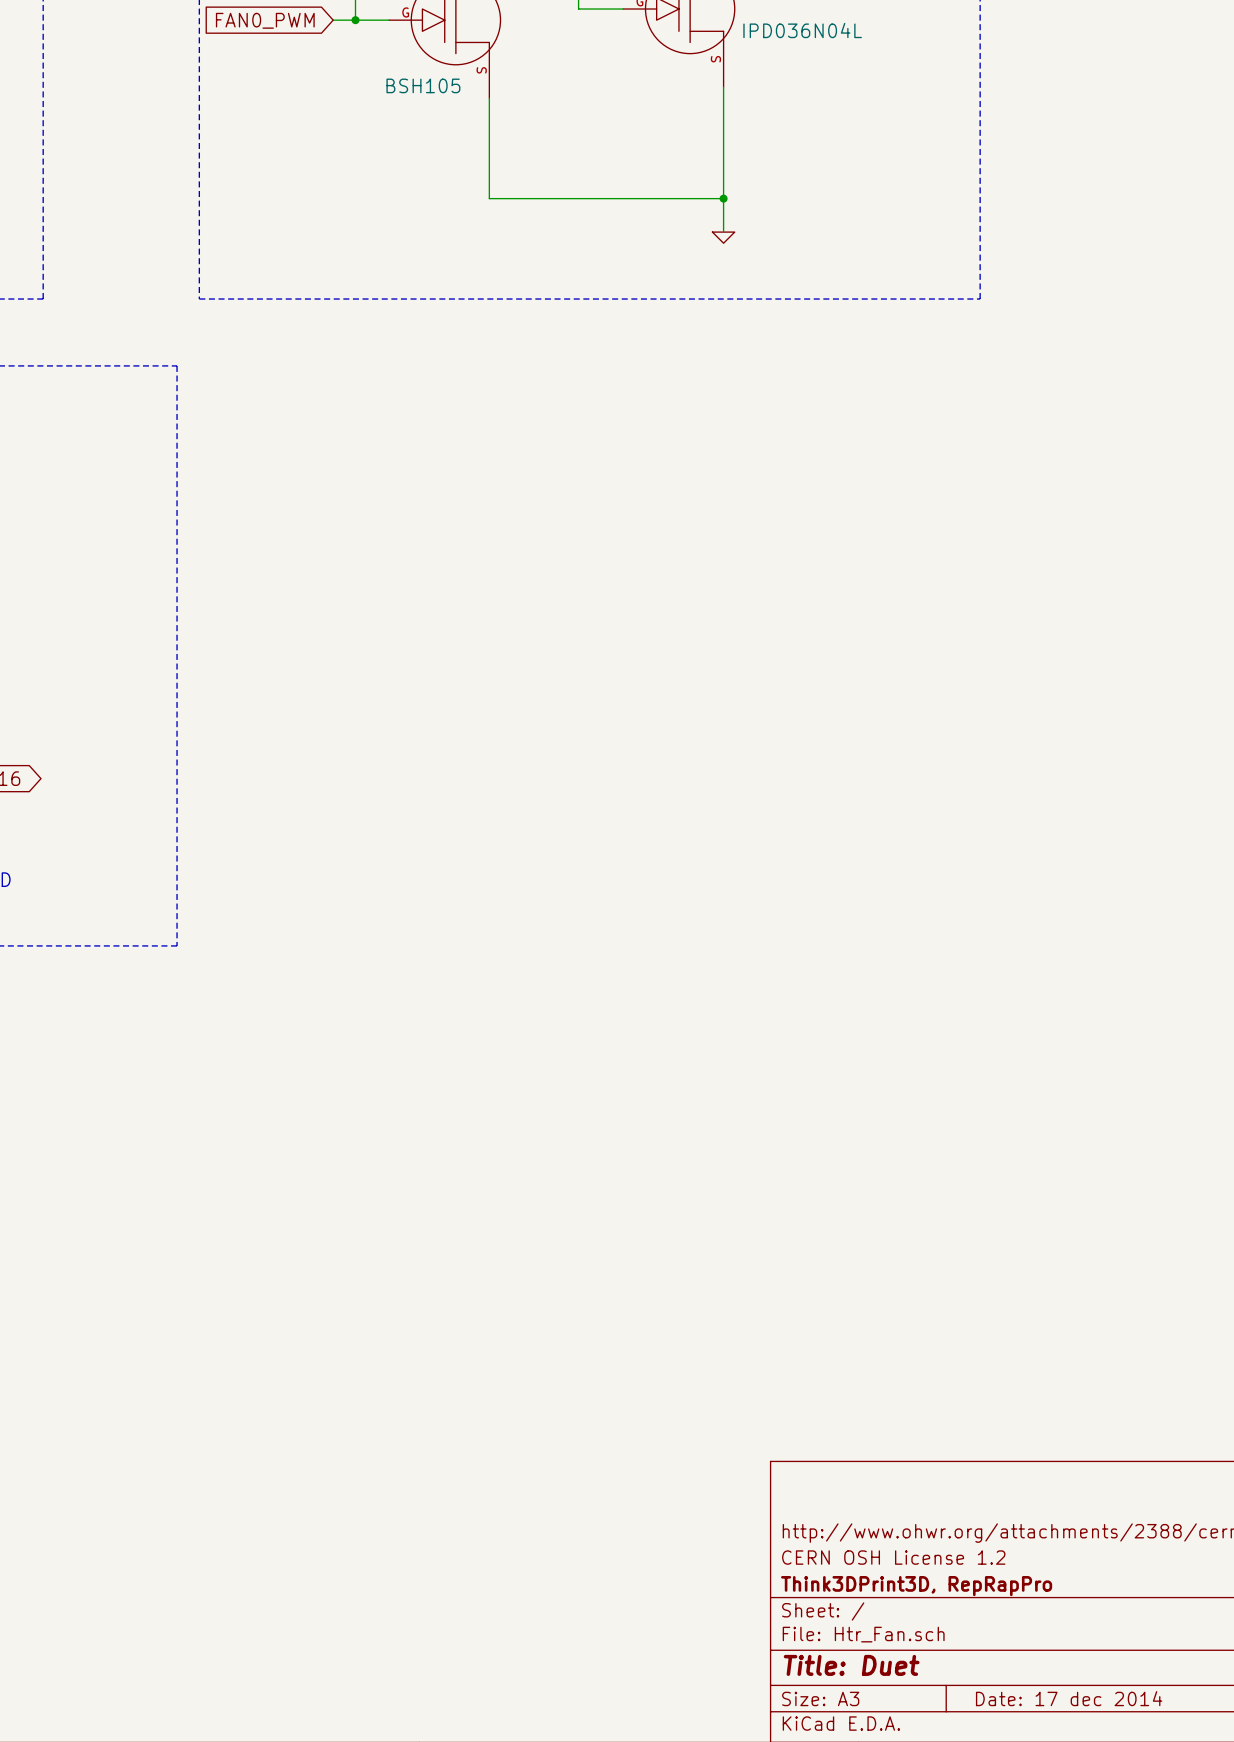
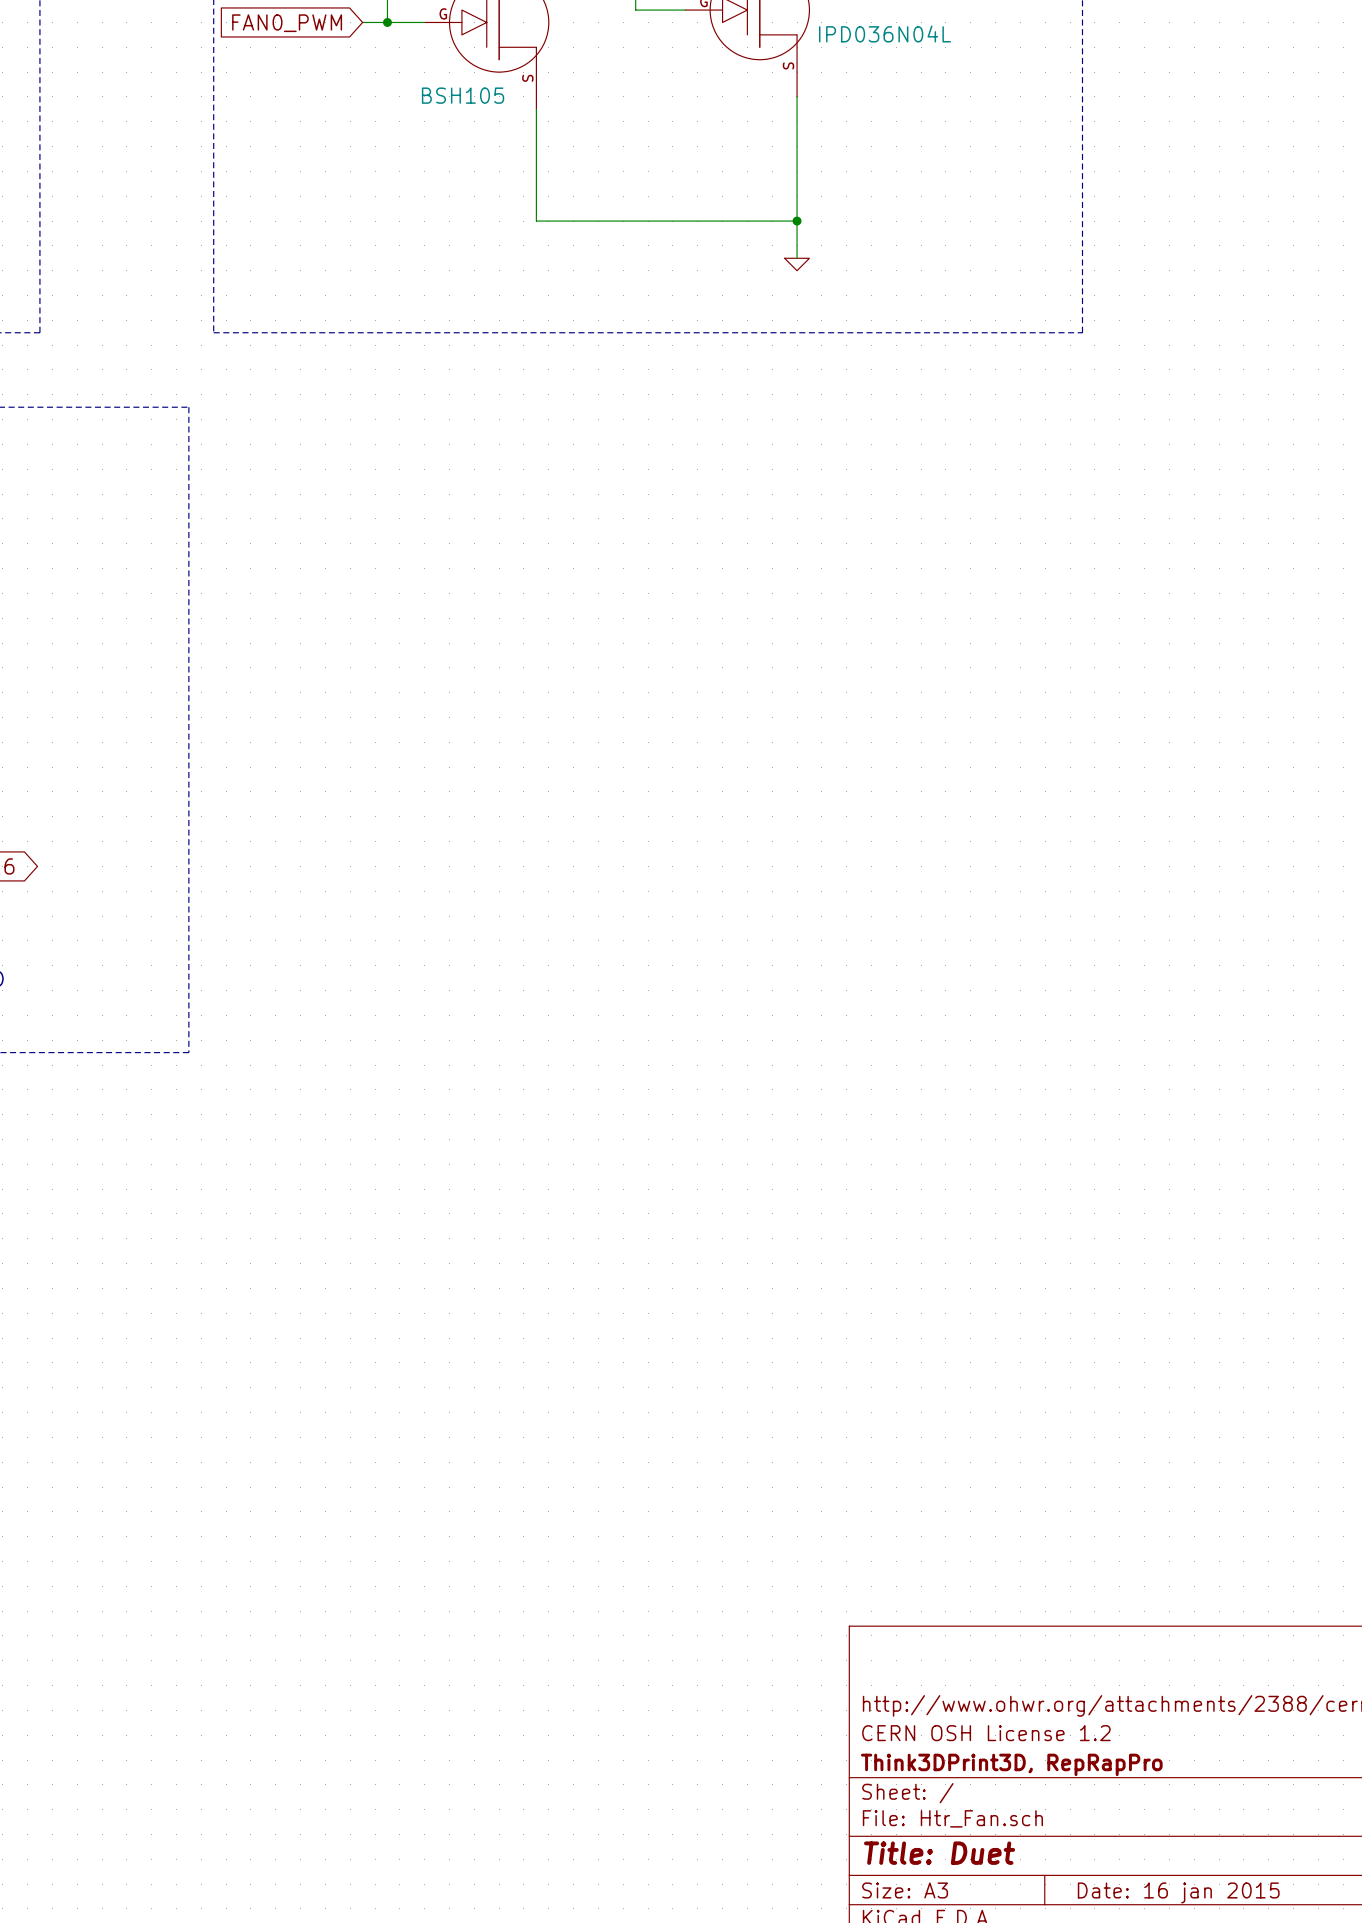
title block: Date: 17 dec 2014 (1069, 1698) -> Date: 16 jan 2015 (1178, 1892)

